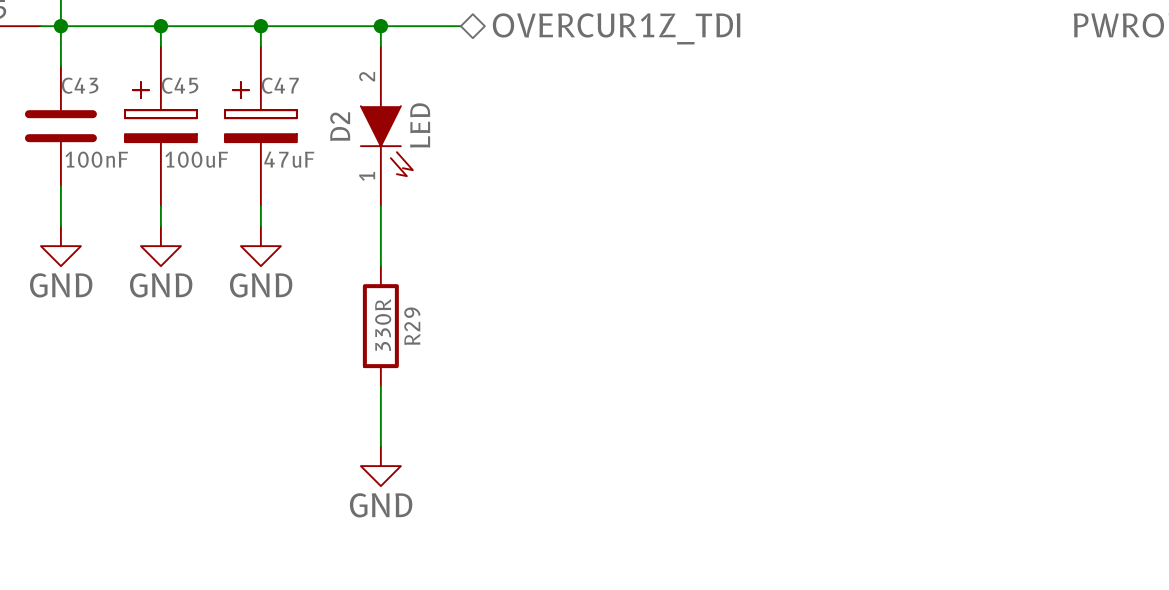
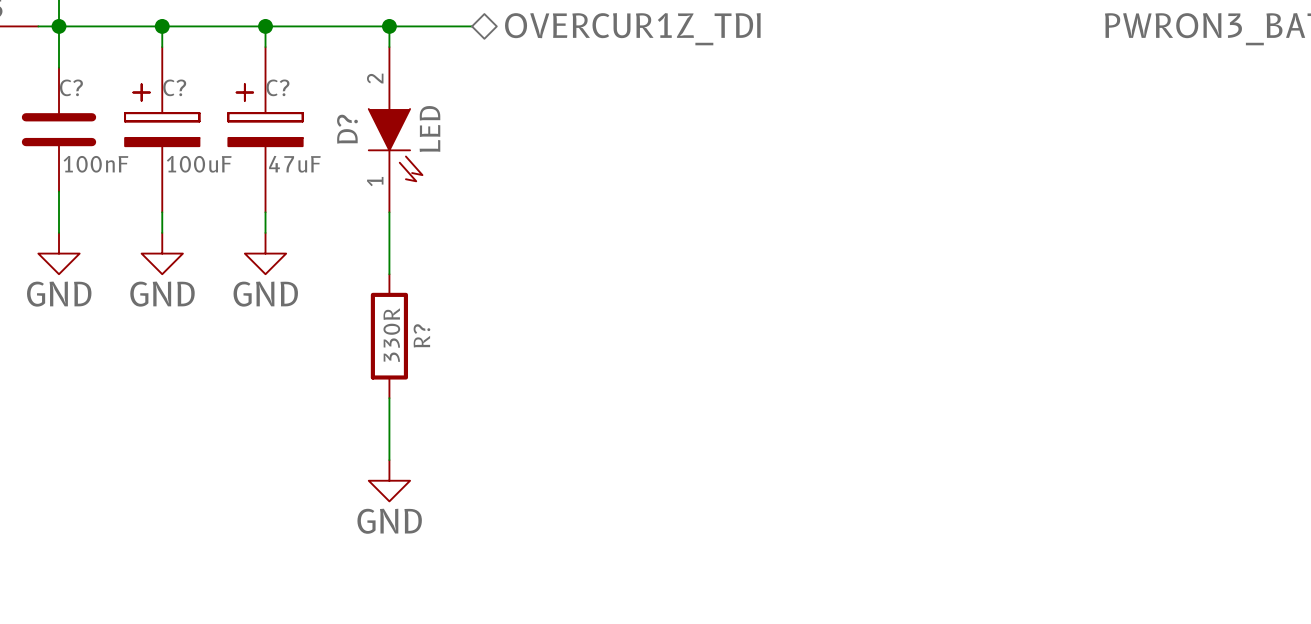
C43 name: C43 (80, 85) -> C? (71, 87)
C45 name: C45 (180, 85) -> C? (174, 87)
C47 name: C47 (280, 85) -> C? (277, 87)
D2 name: D2 (340, 126) -> D? (347, 129)
R29 name: R29 (412, 326) -> R? (421, 335)

